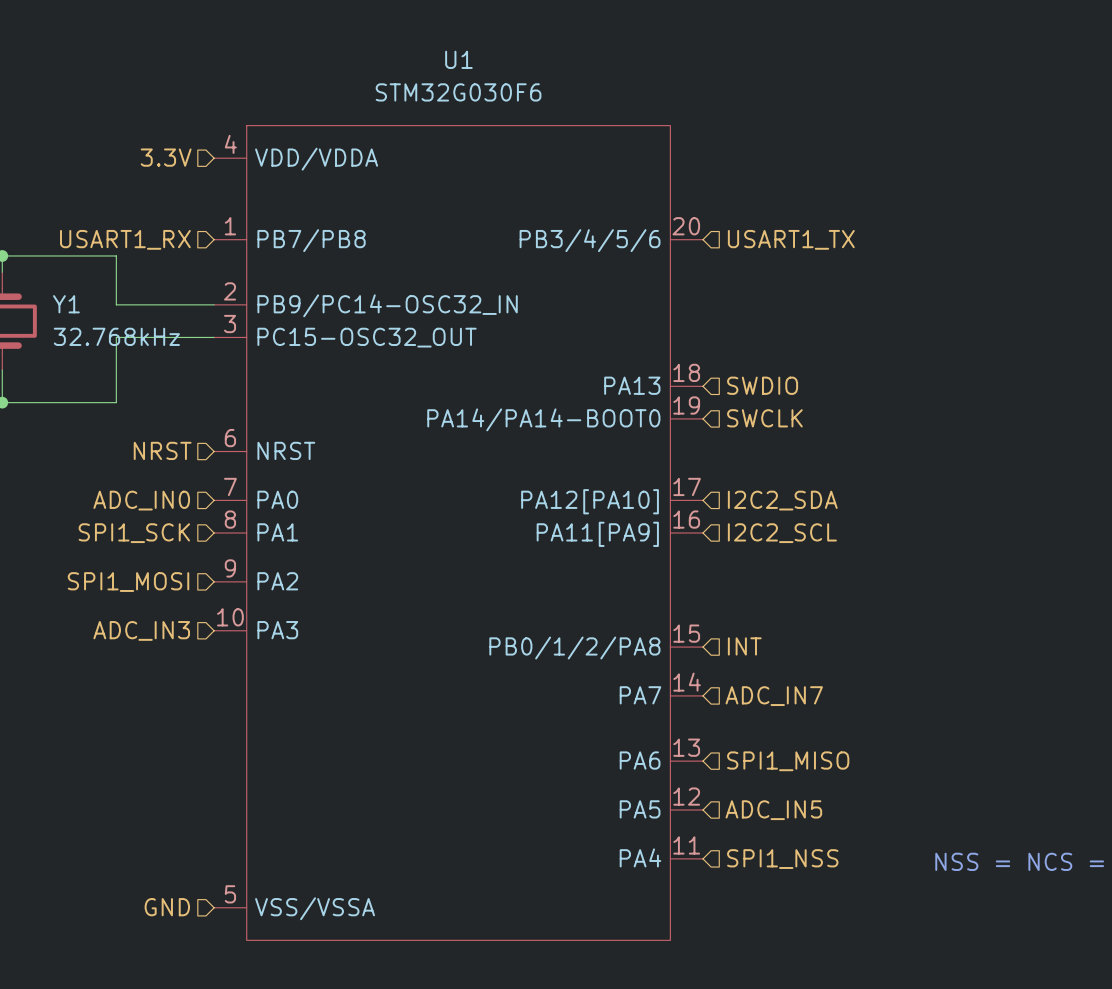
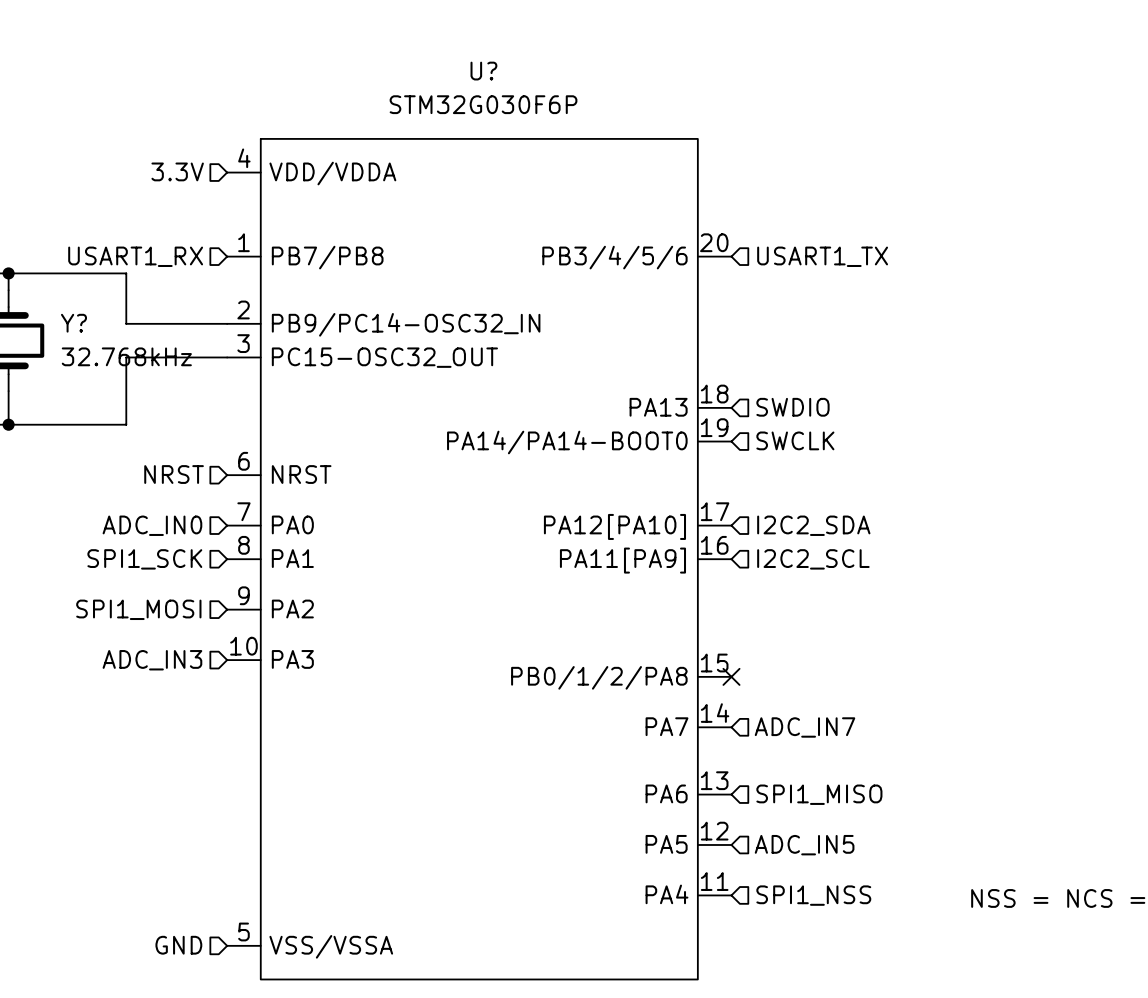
U1 name: U1 (458, 59) -> U? (483, 71)
U1 value: STM32G030F6 (458, 92) -> STM32G030F6P (483, 104)
Y1 name: Y1 (66, 304) -> Y? (73, 323)
hierarchical label: INT (744, 646) -> none
no-connect mark: none -> (731, 676)

